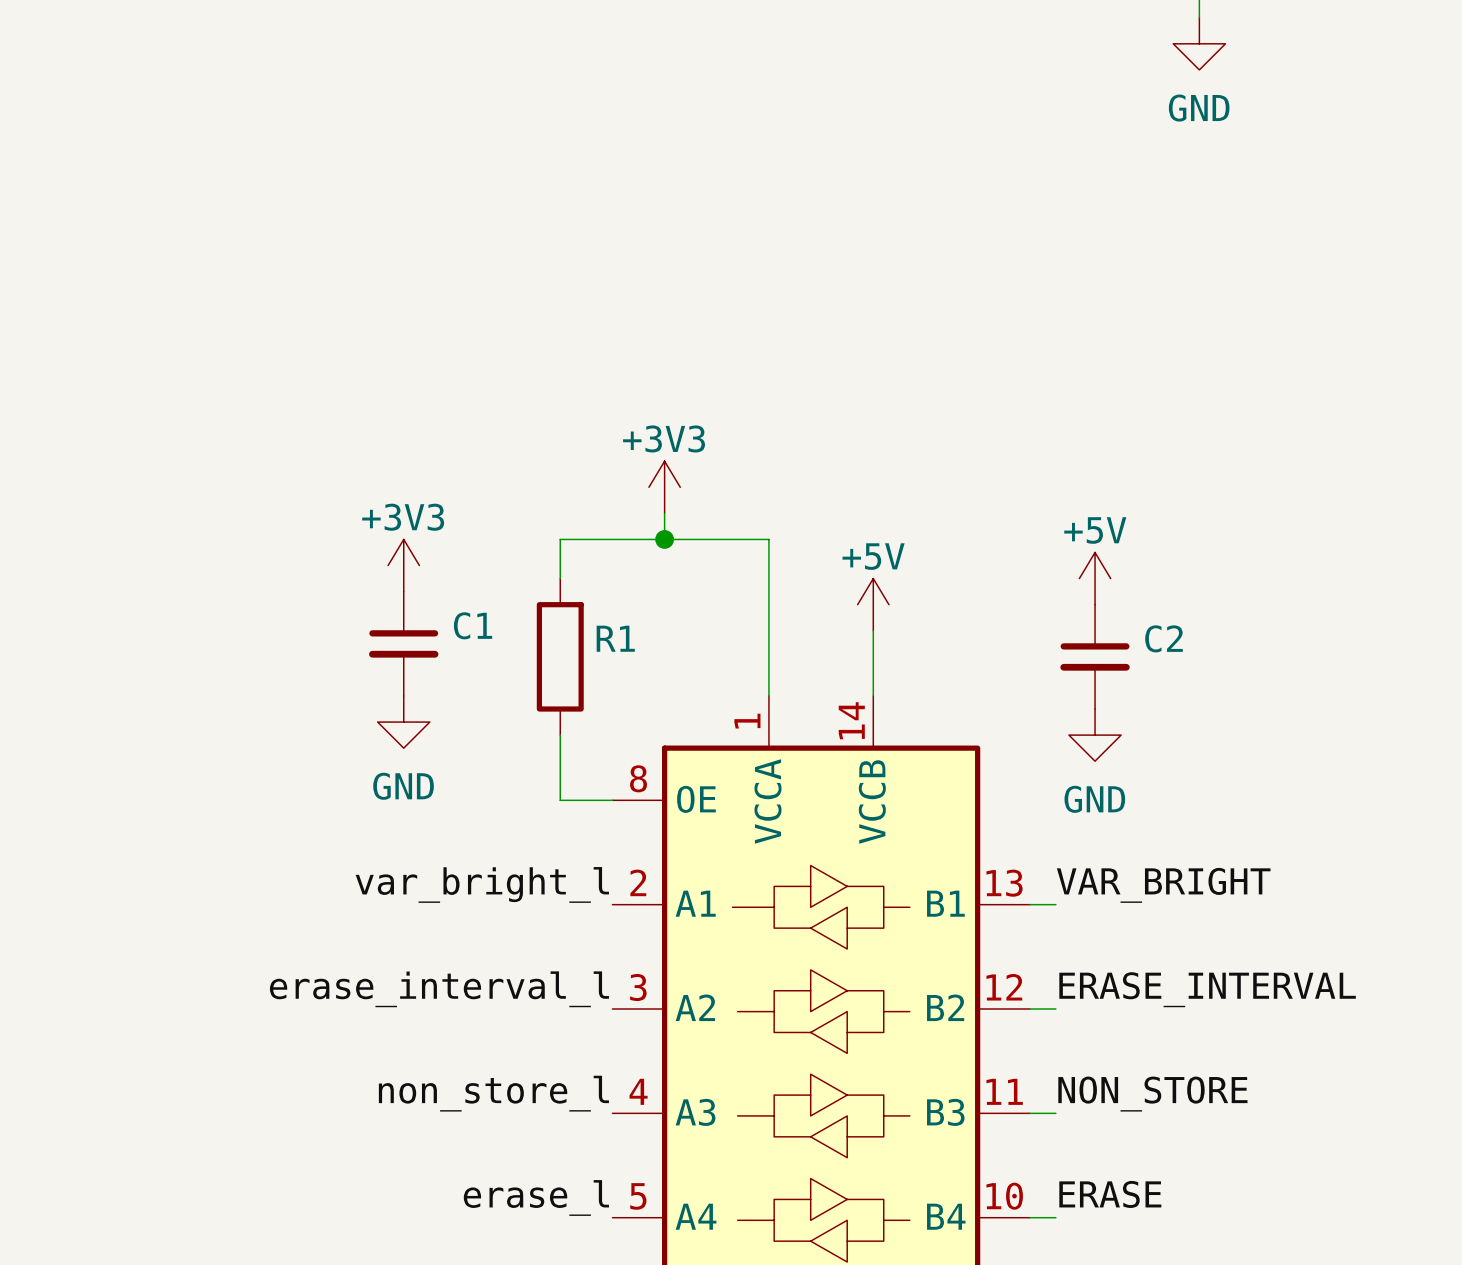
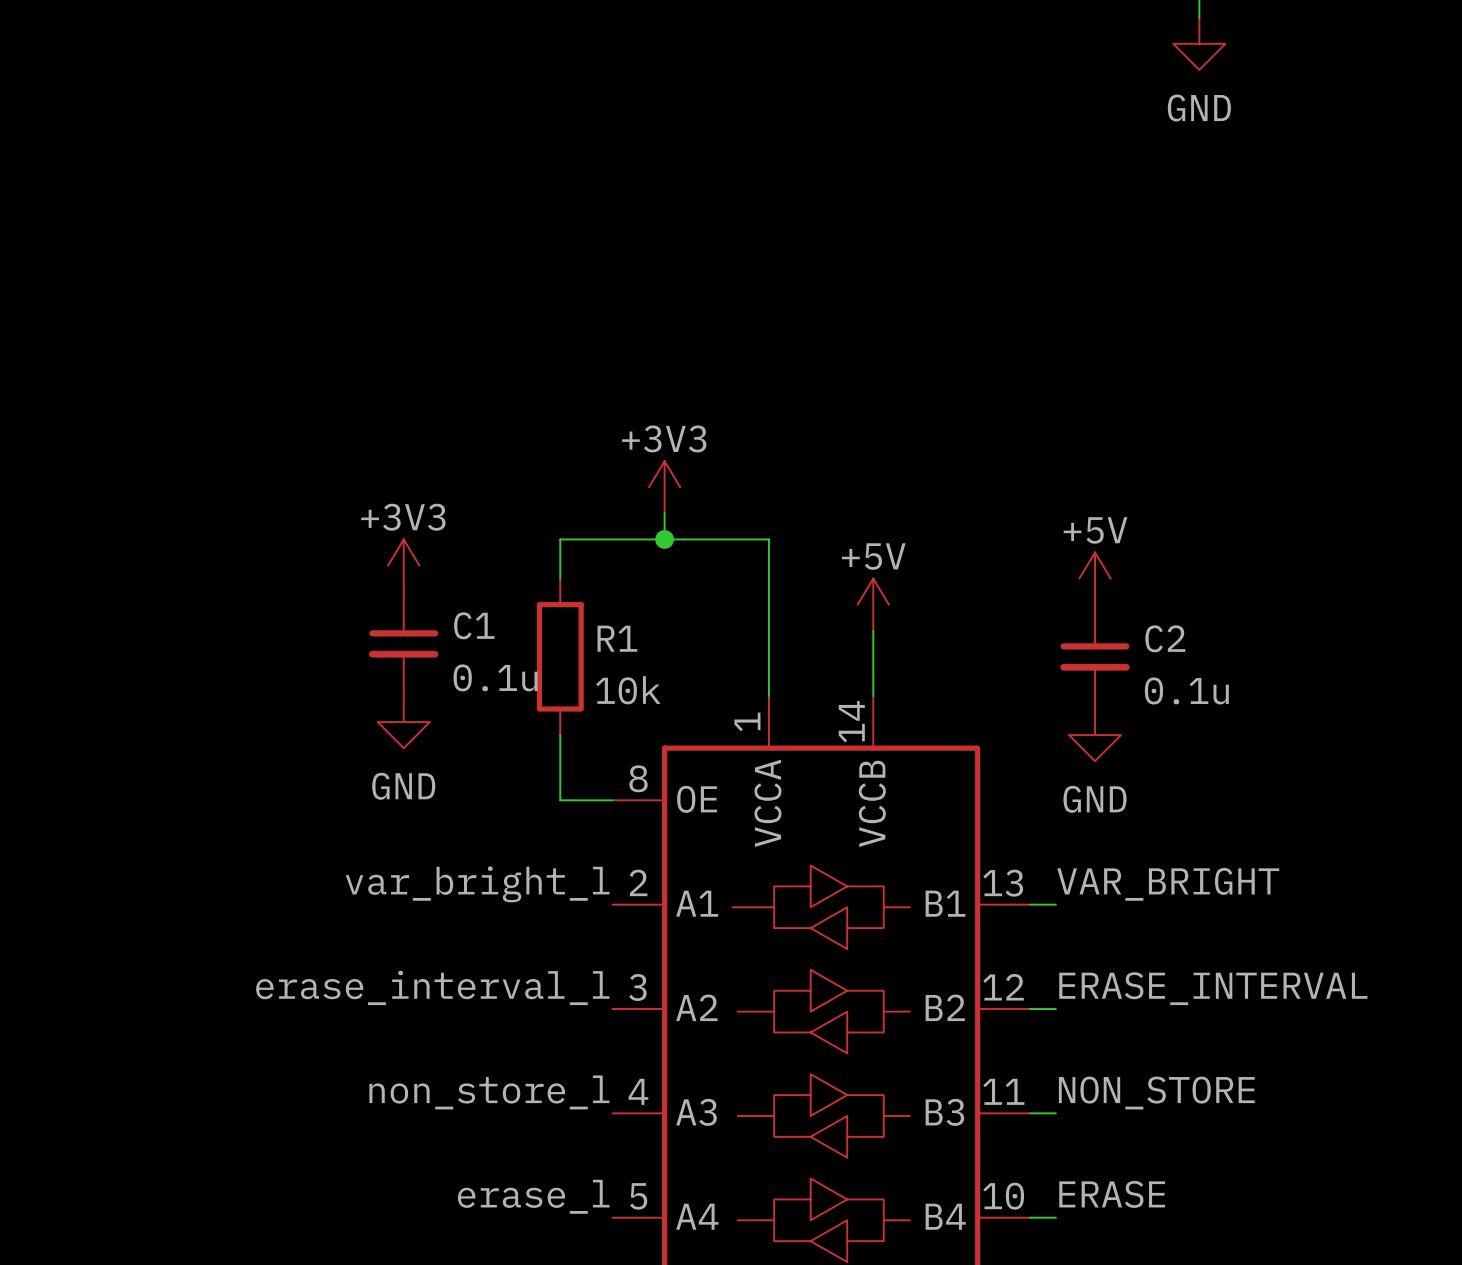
C1 value: none -> 0.1u (495, 677)
R1 value: none -> 10k (628, 690)
C2 value: none -> 0.1u (1186, 690)

